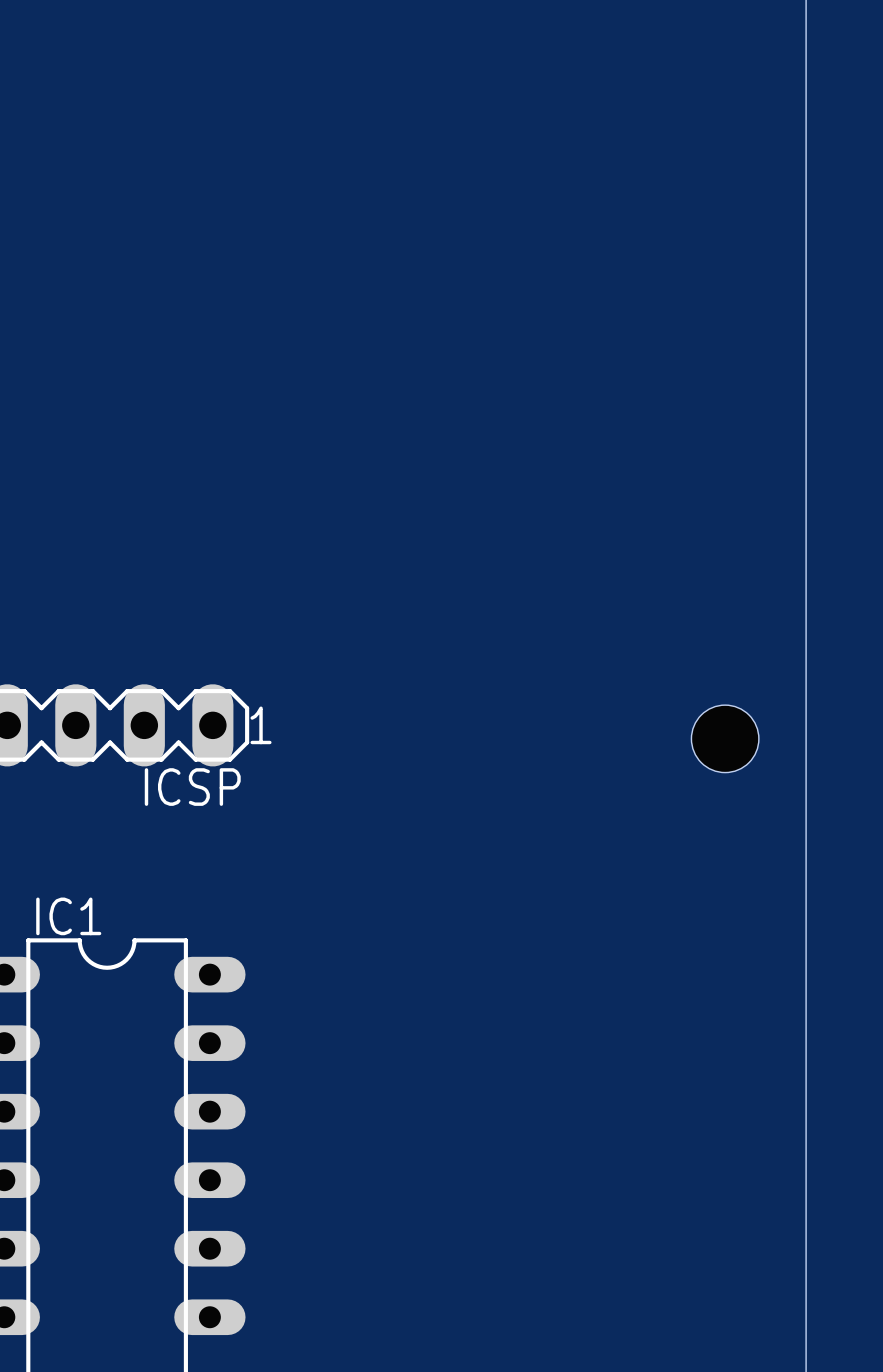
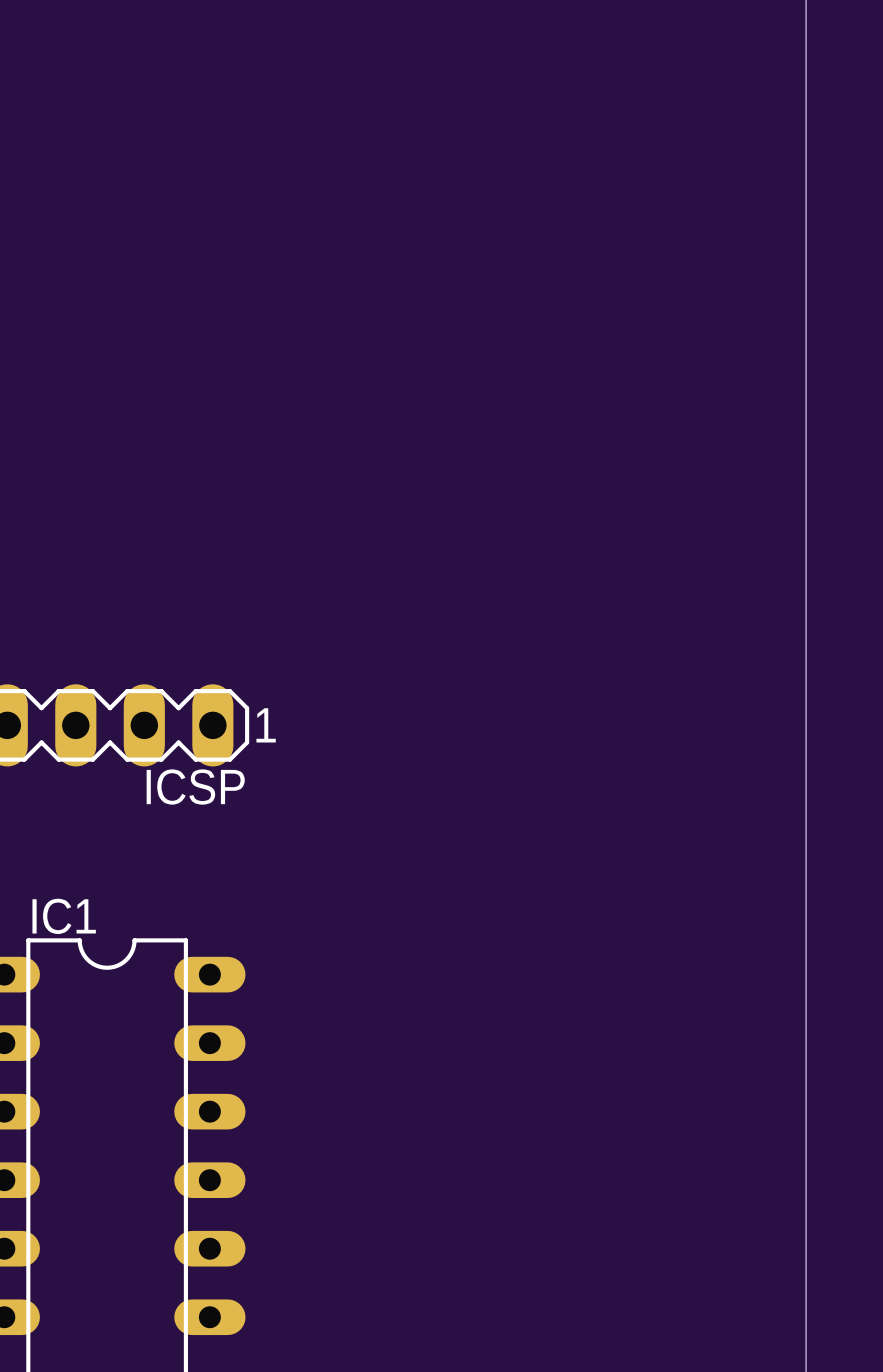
hole: (725, 738) -> none

